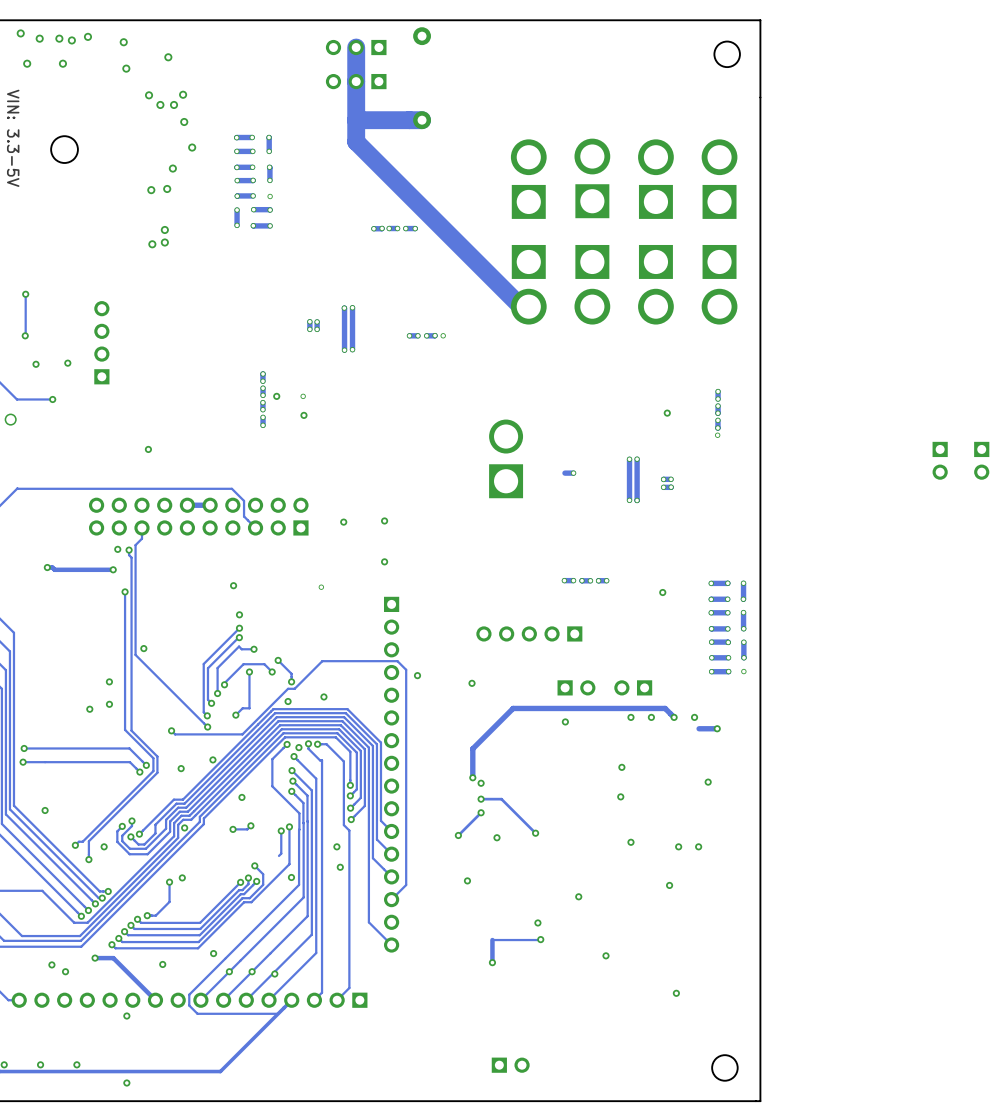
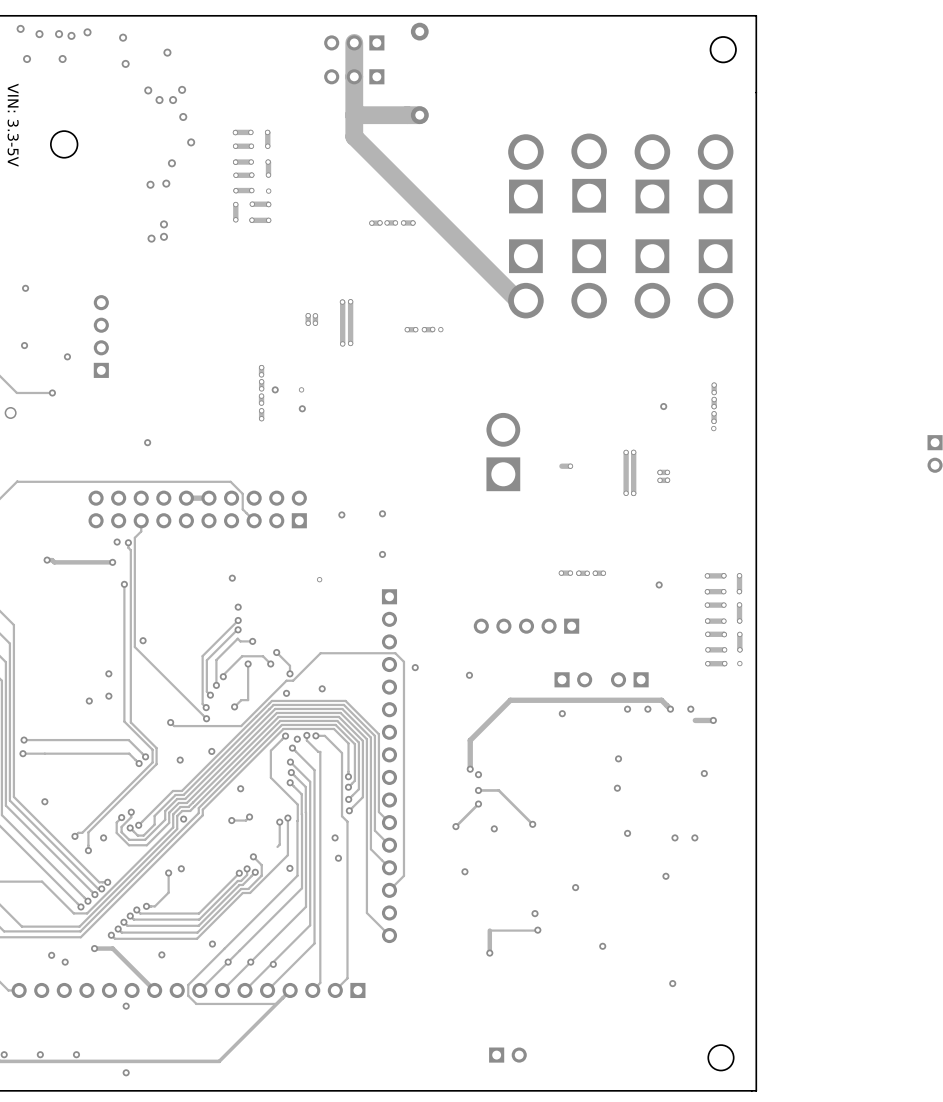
track: (25, 294) (25, 335) -> none
via: (25, 335) -> none
via: none -> (24, 345)
via: (36, 364) -> none

